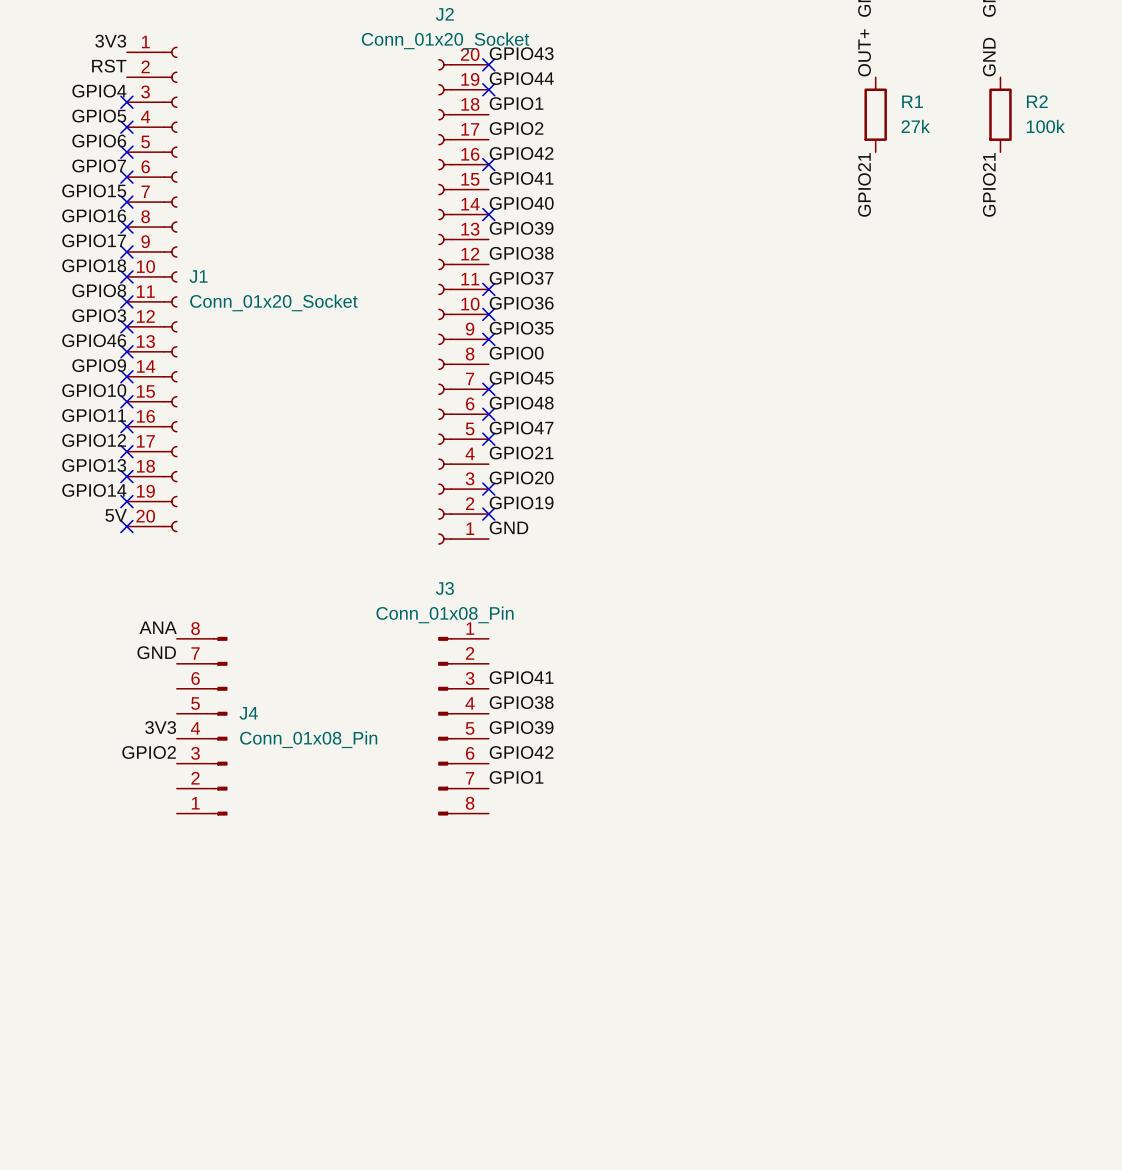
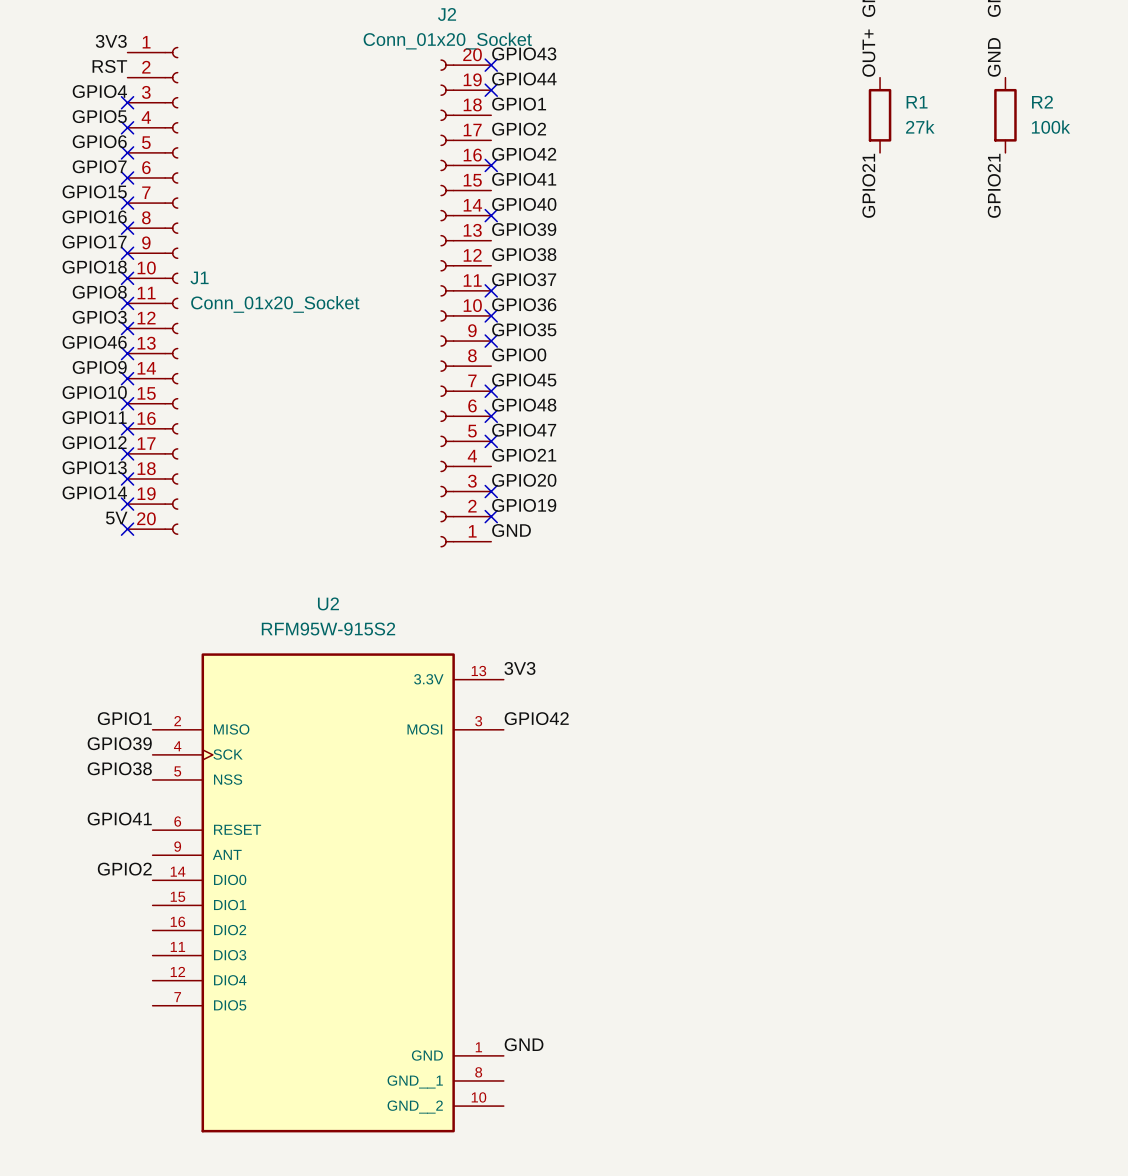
label: ANA (158, 627) -> none
label: GND (156, 652) -> none
label: none -> 3V3 (519, 668)
label: GPIO41 (521, 677) -> none
label: GPIO38 (521, 702) -> none
label: none -> GPIO1 (124, 718)
J4: Conn_01x08_Pin (202, 726) -> none
J3: Conn_01x08_Pin (463, 726) -> none
label: 3V3 (160, 727) -> none
label: GPIO39 (521, 727) -> none
label: none -> GPIO39 (119, 743)
label position: GPIO2 (149, 752) -> GPIO2 (124, 869)
label position: GPIO42 (521, 752) -> GPIO42 (536, 718)
label: none -> GPIO38 (119, 768)
label: GPIO1 (516, 777) -> none
label: none -> GPIO41 (119, 818)
U2: none -> RFM95W-915S2 (328, 892)
label: none -> GND (524, 1044)

